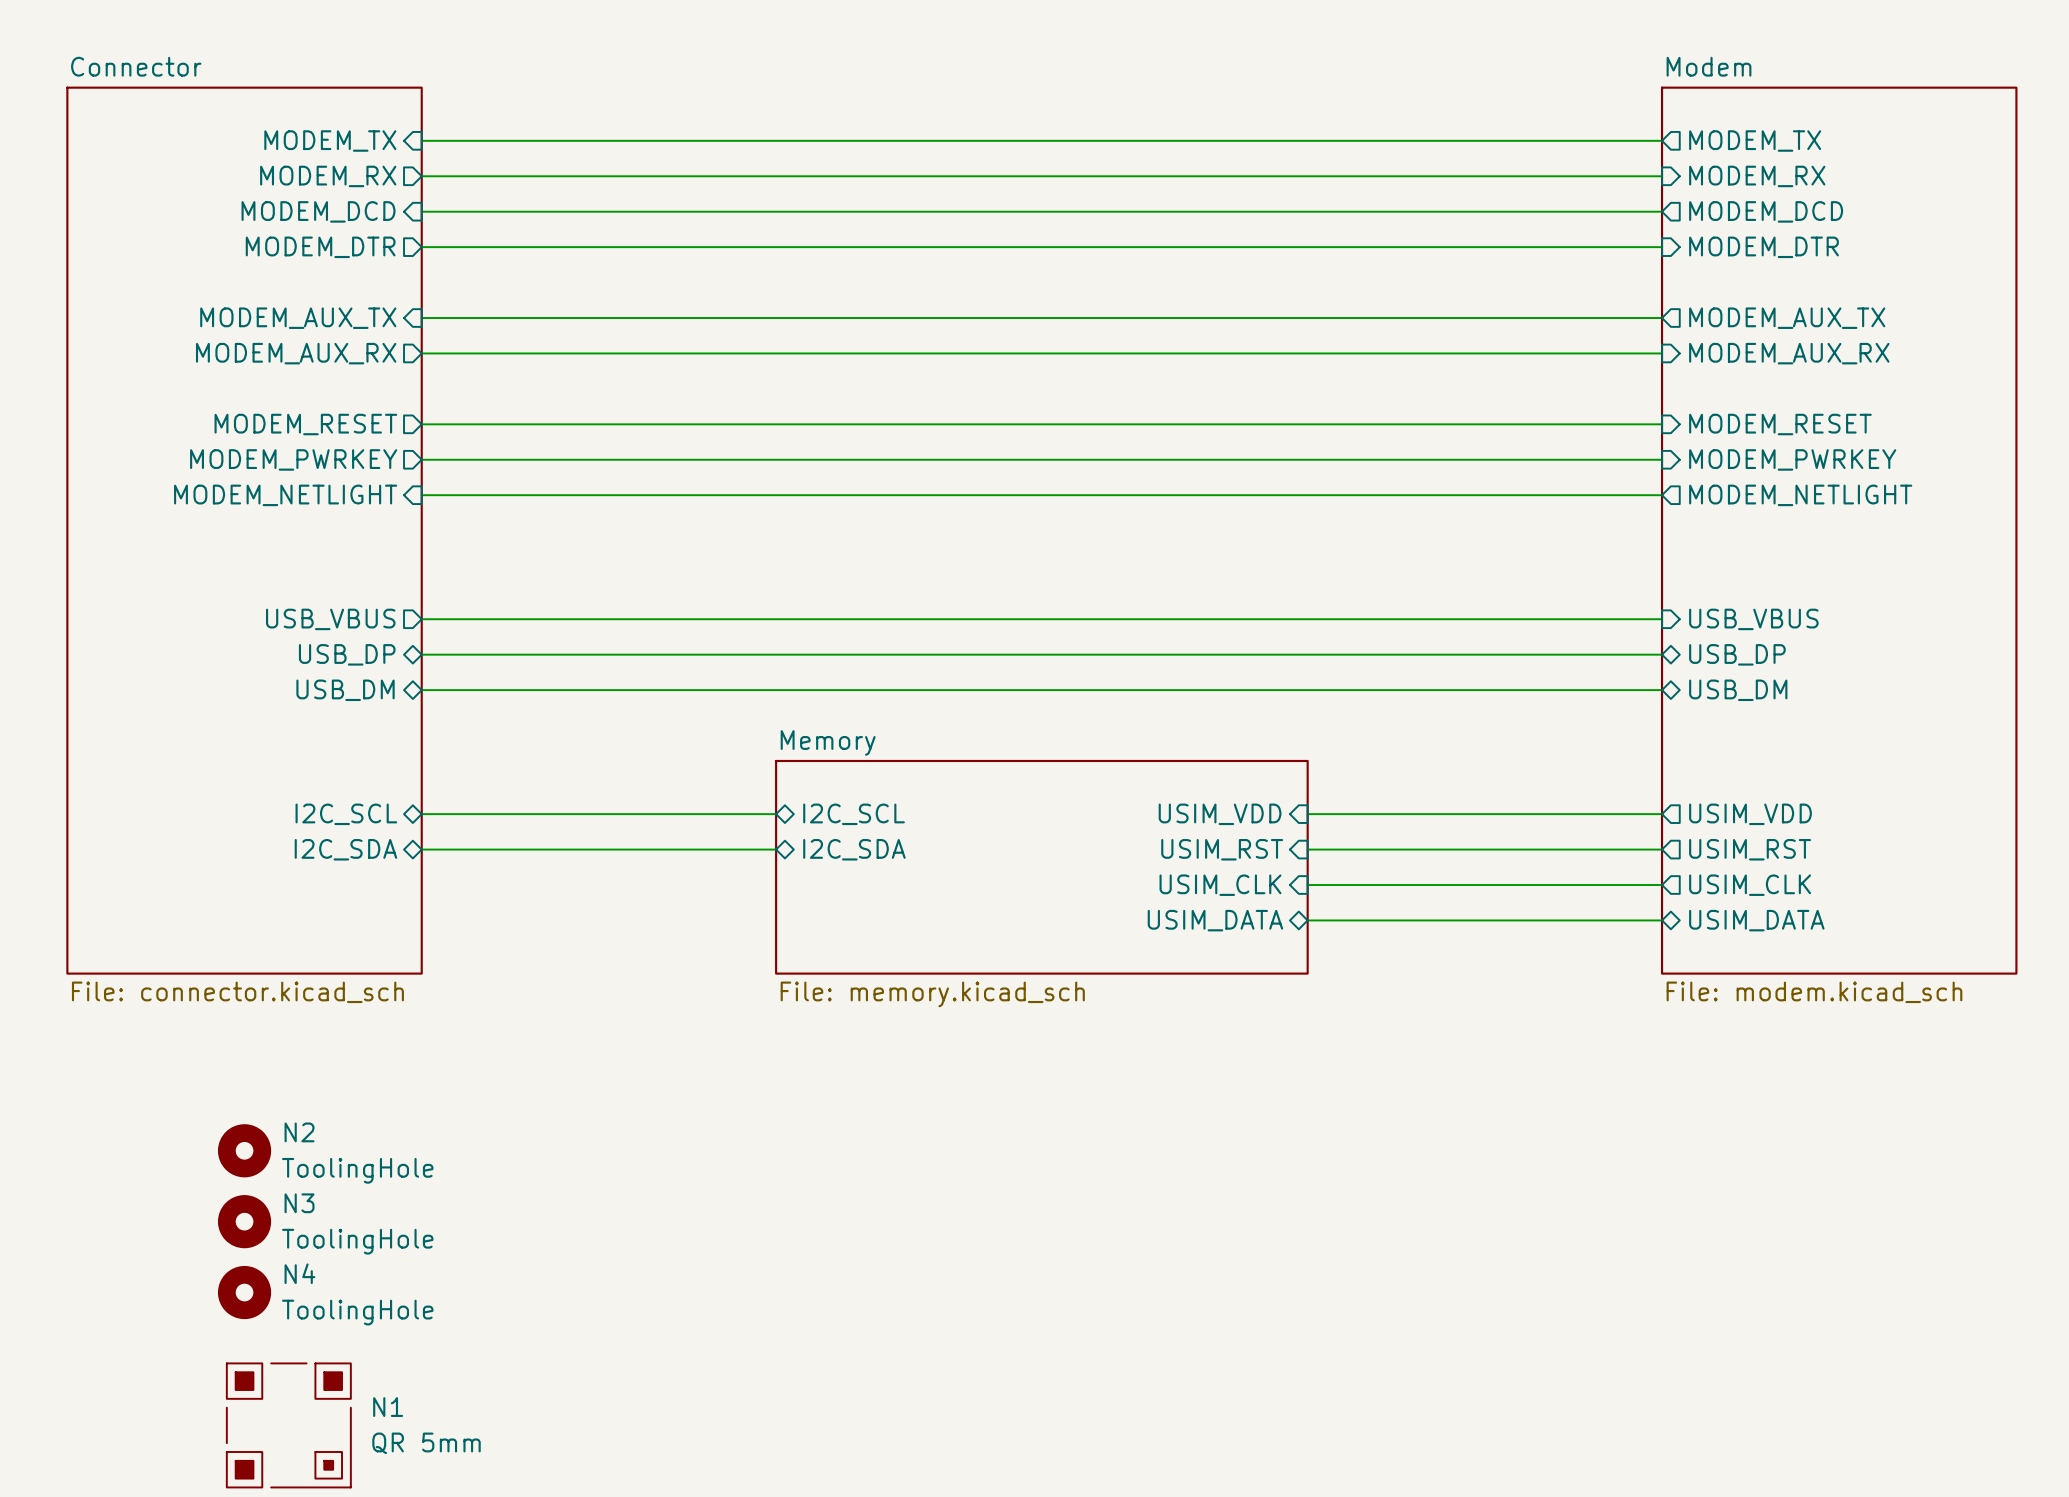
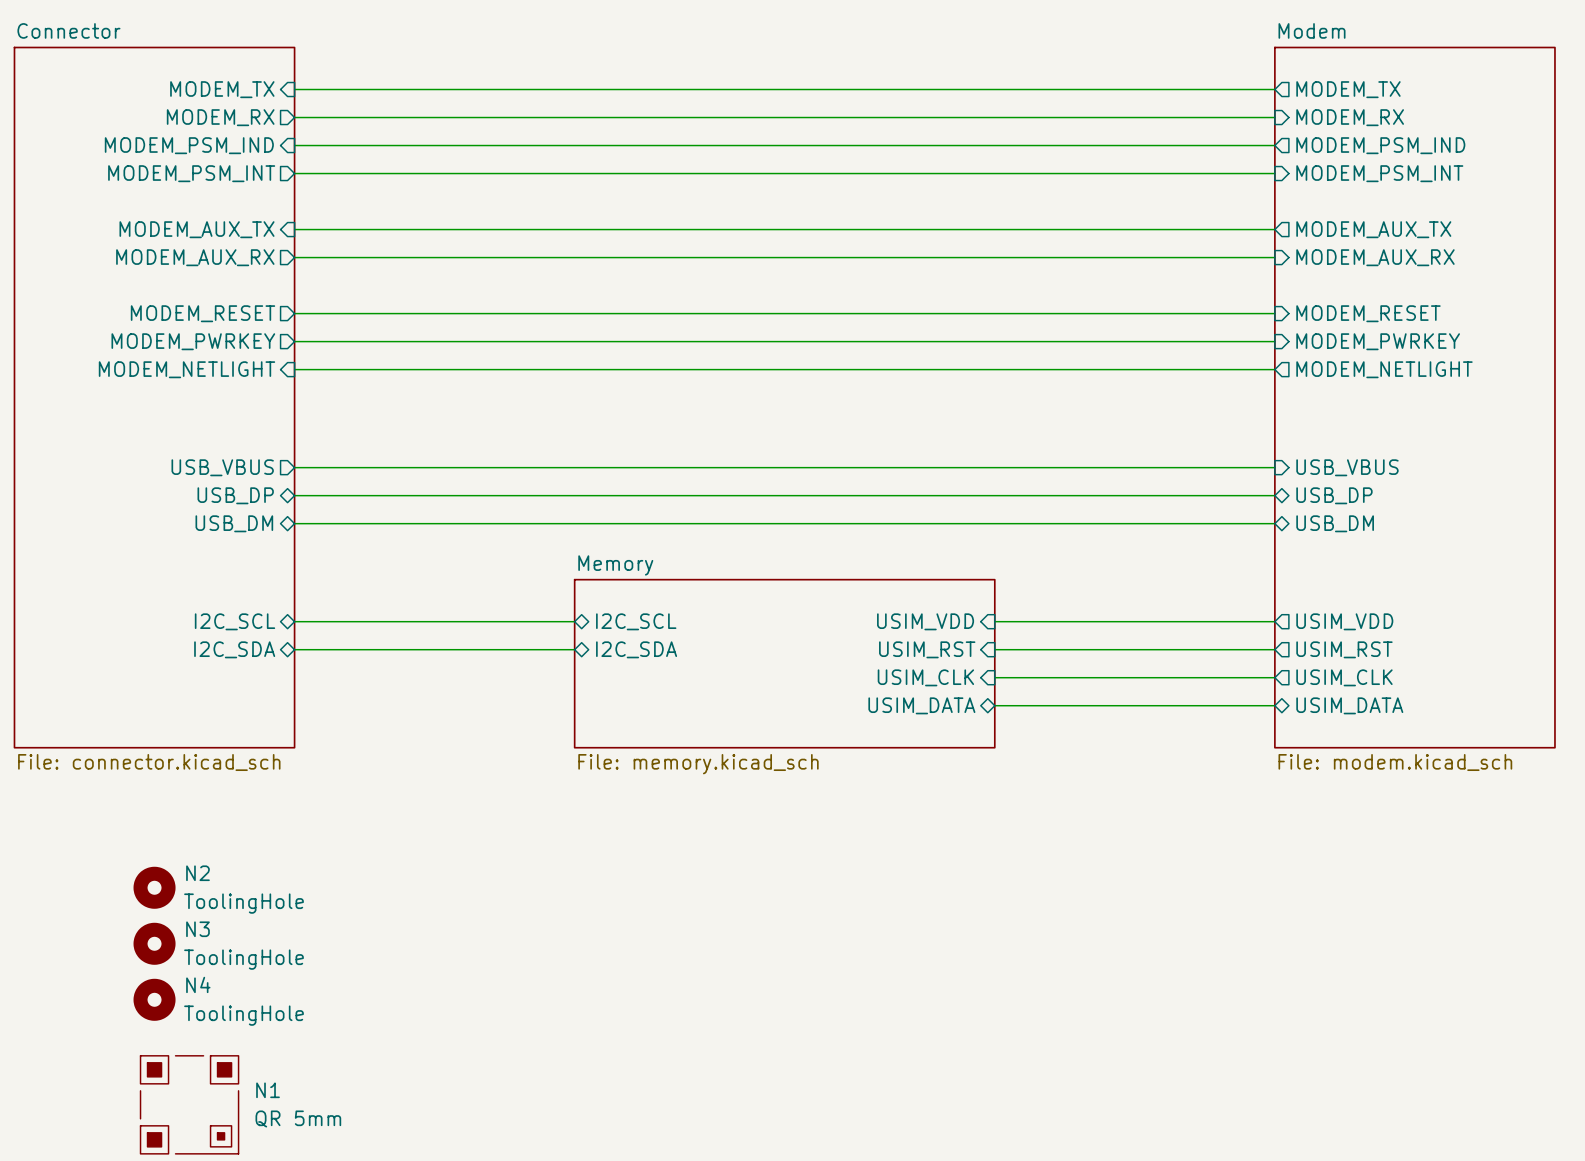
sheet pin: MODEM_DCD (318, 211) -> MODEM_PSM_IND (189, 145)
sheet pin: MODEM_DCD (1766, 211) -> MODEM_PSM_IND (1380, 145)
sheet pin: MODEM_DTR (320, 247) -> MODEM_PSM_INT (191, 173)
sheet pin: MODEM_DTR (1763, 247) -> MODEM_PSM_INT (1379, 173)

